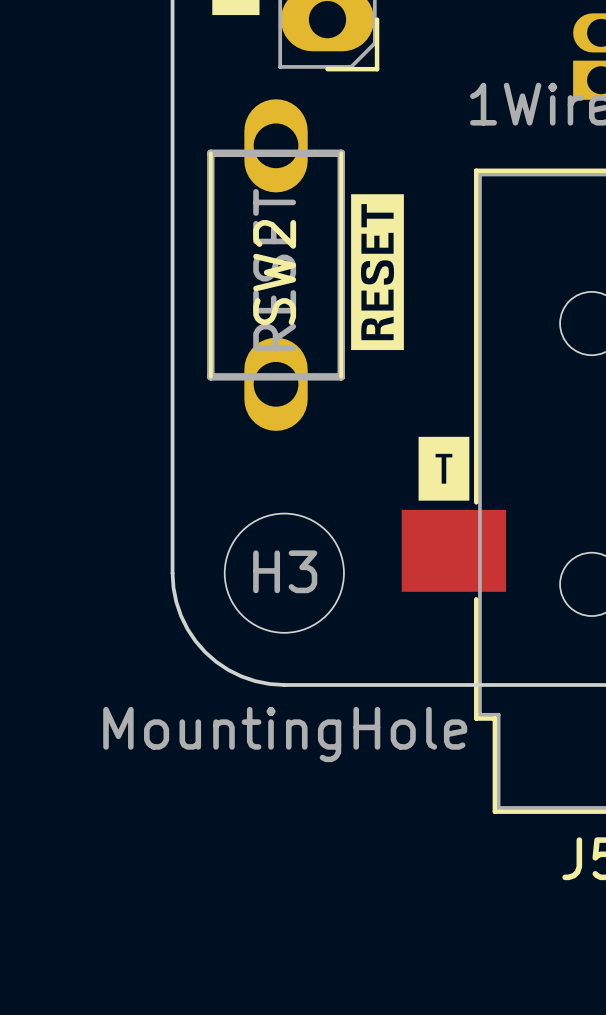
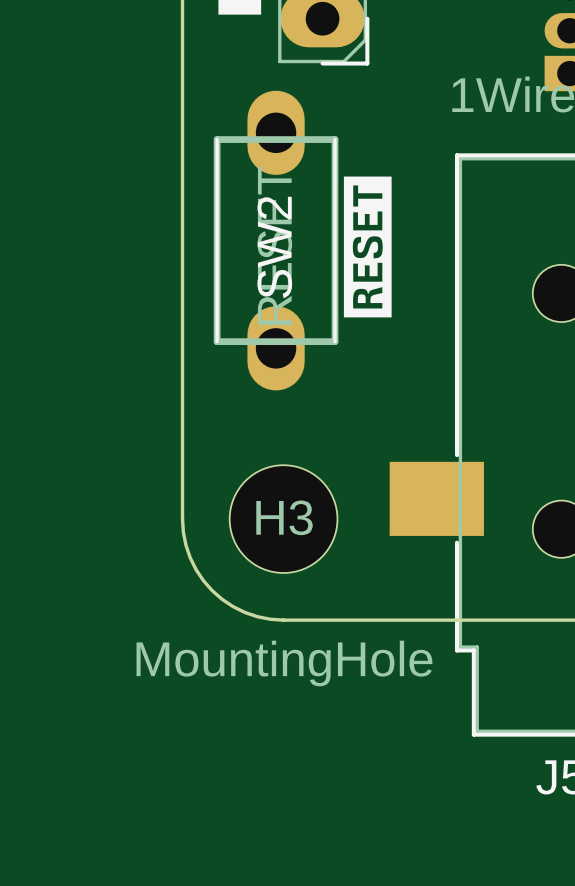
drawing: [418, 436, 470, 501] -> none

